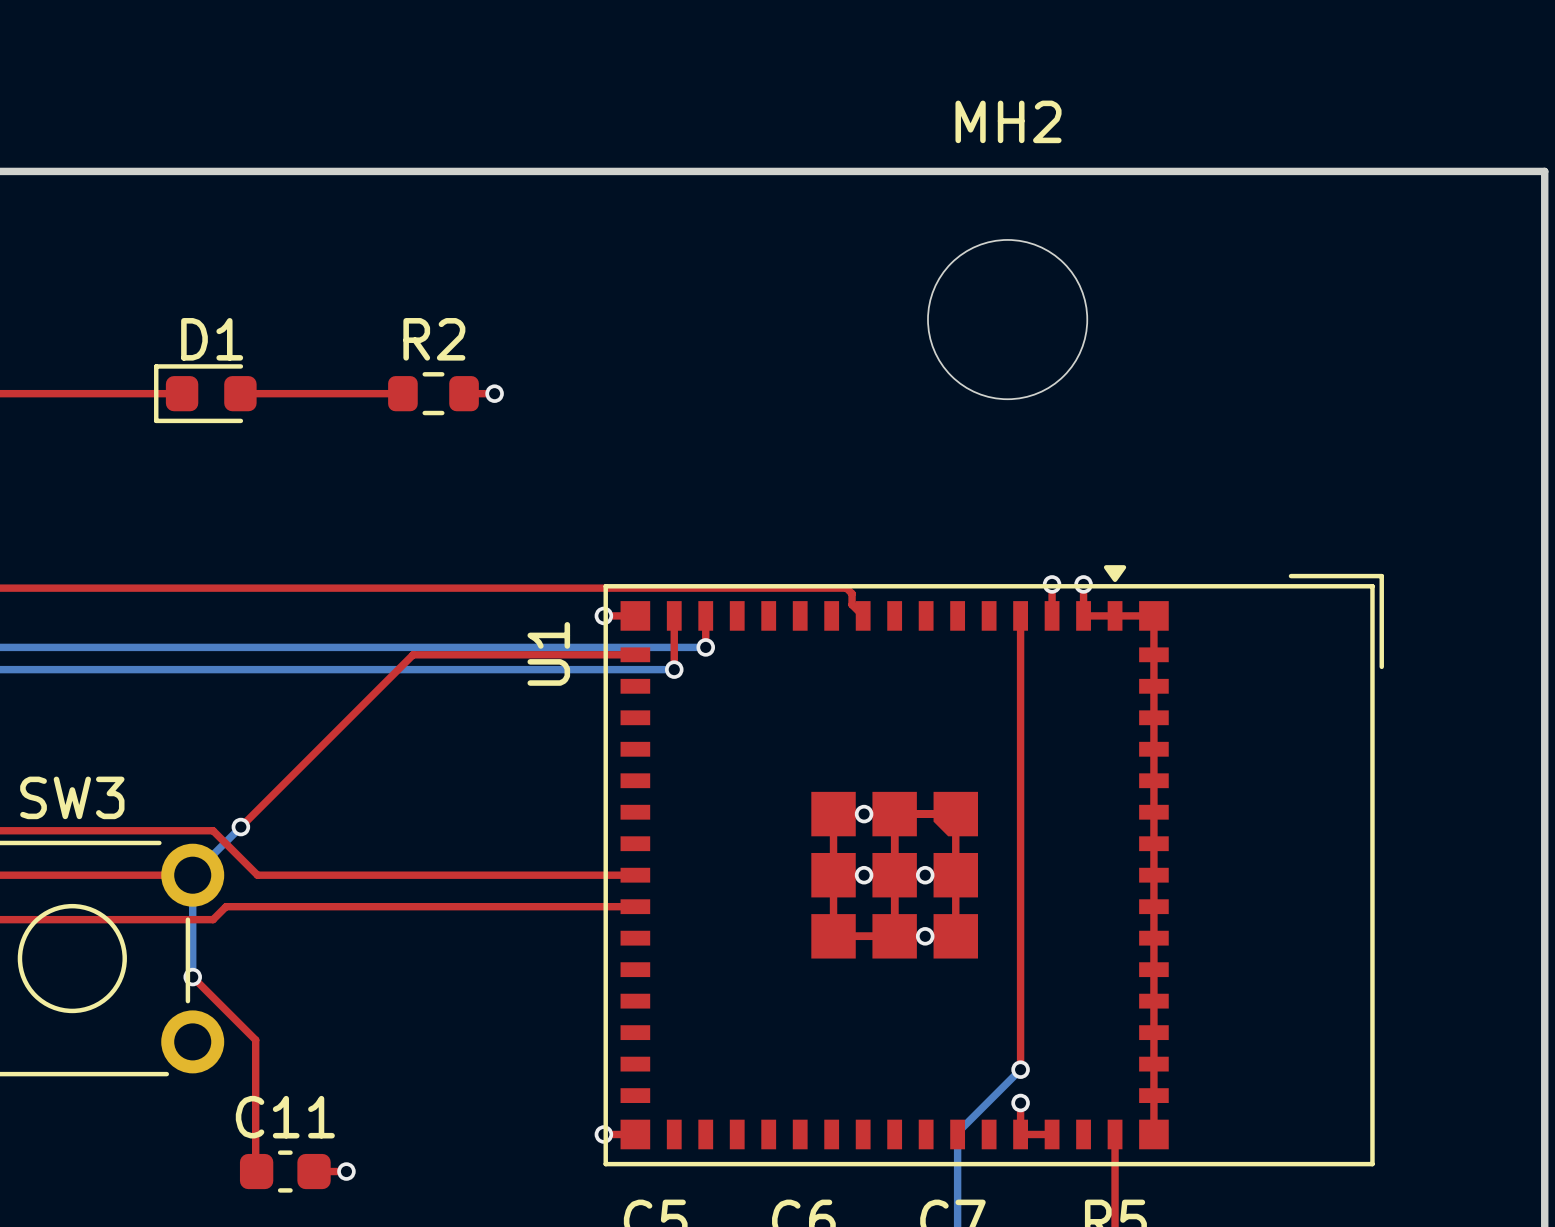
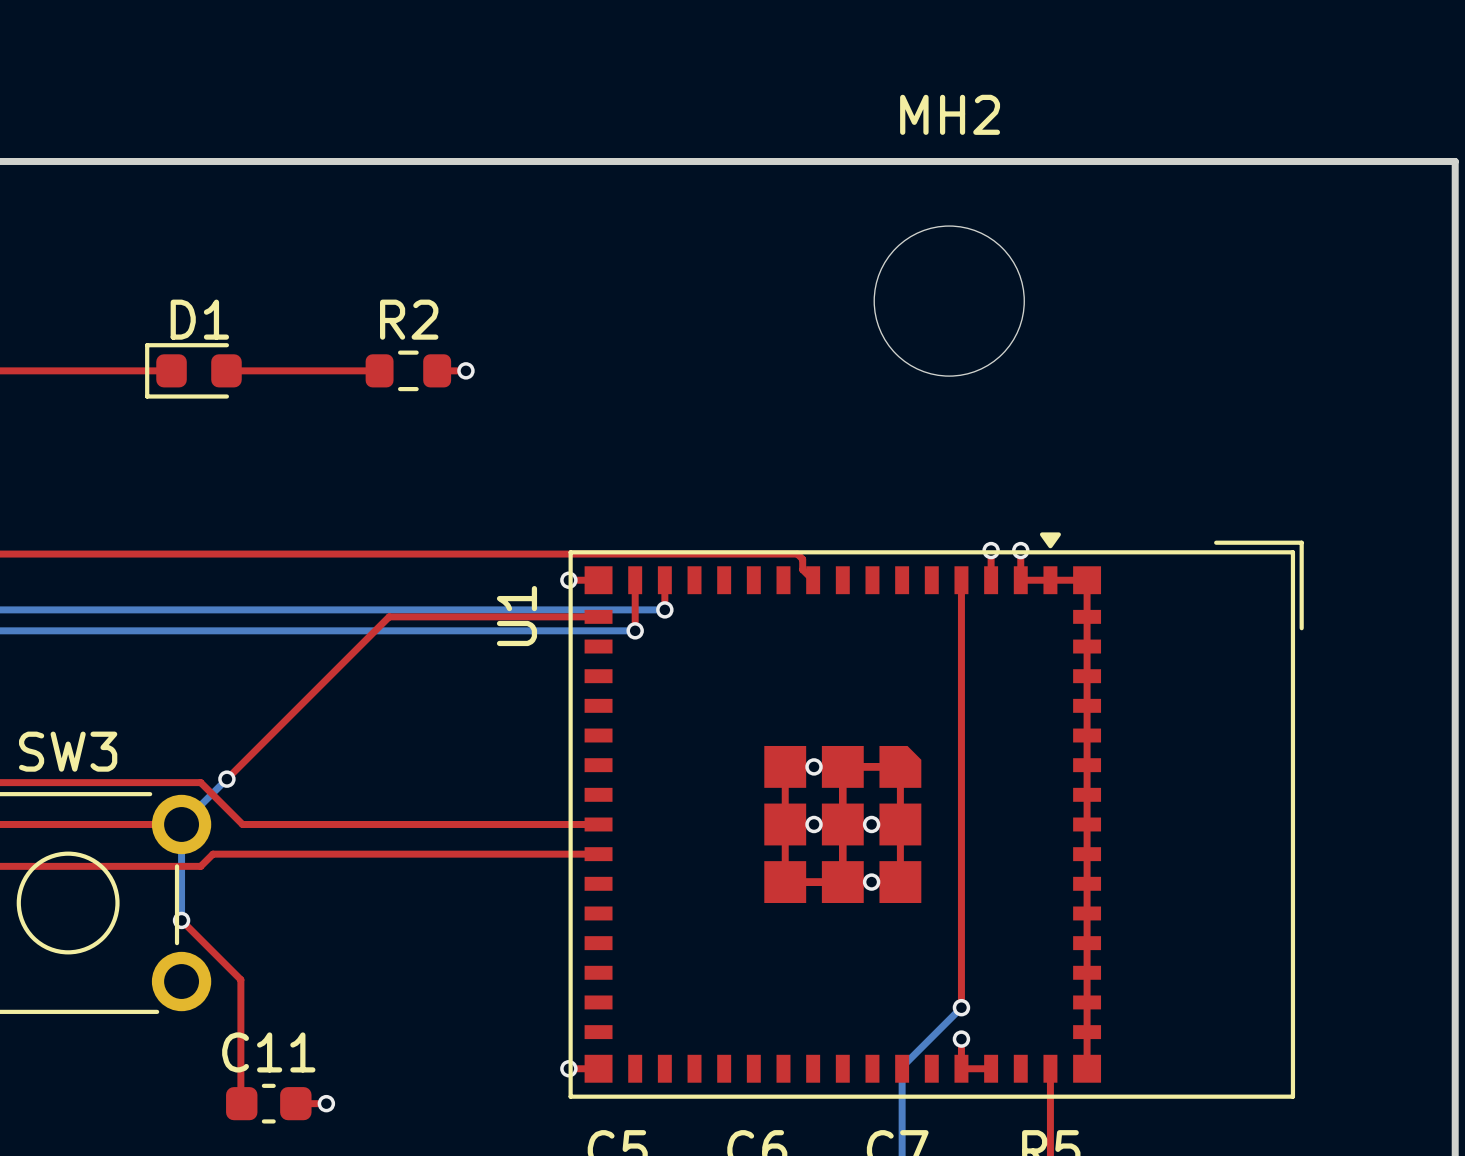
U1 footprint: [603, 565, 1384, 1167] -> [568, 532, 1304, 1099]

